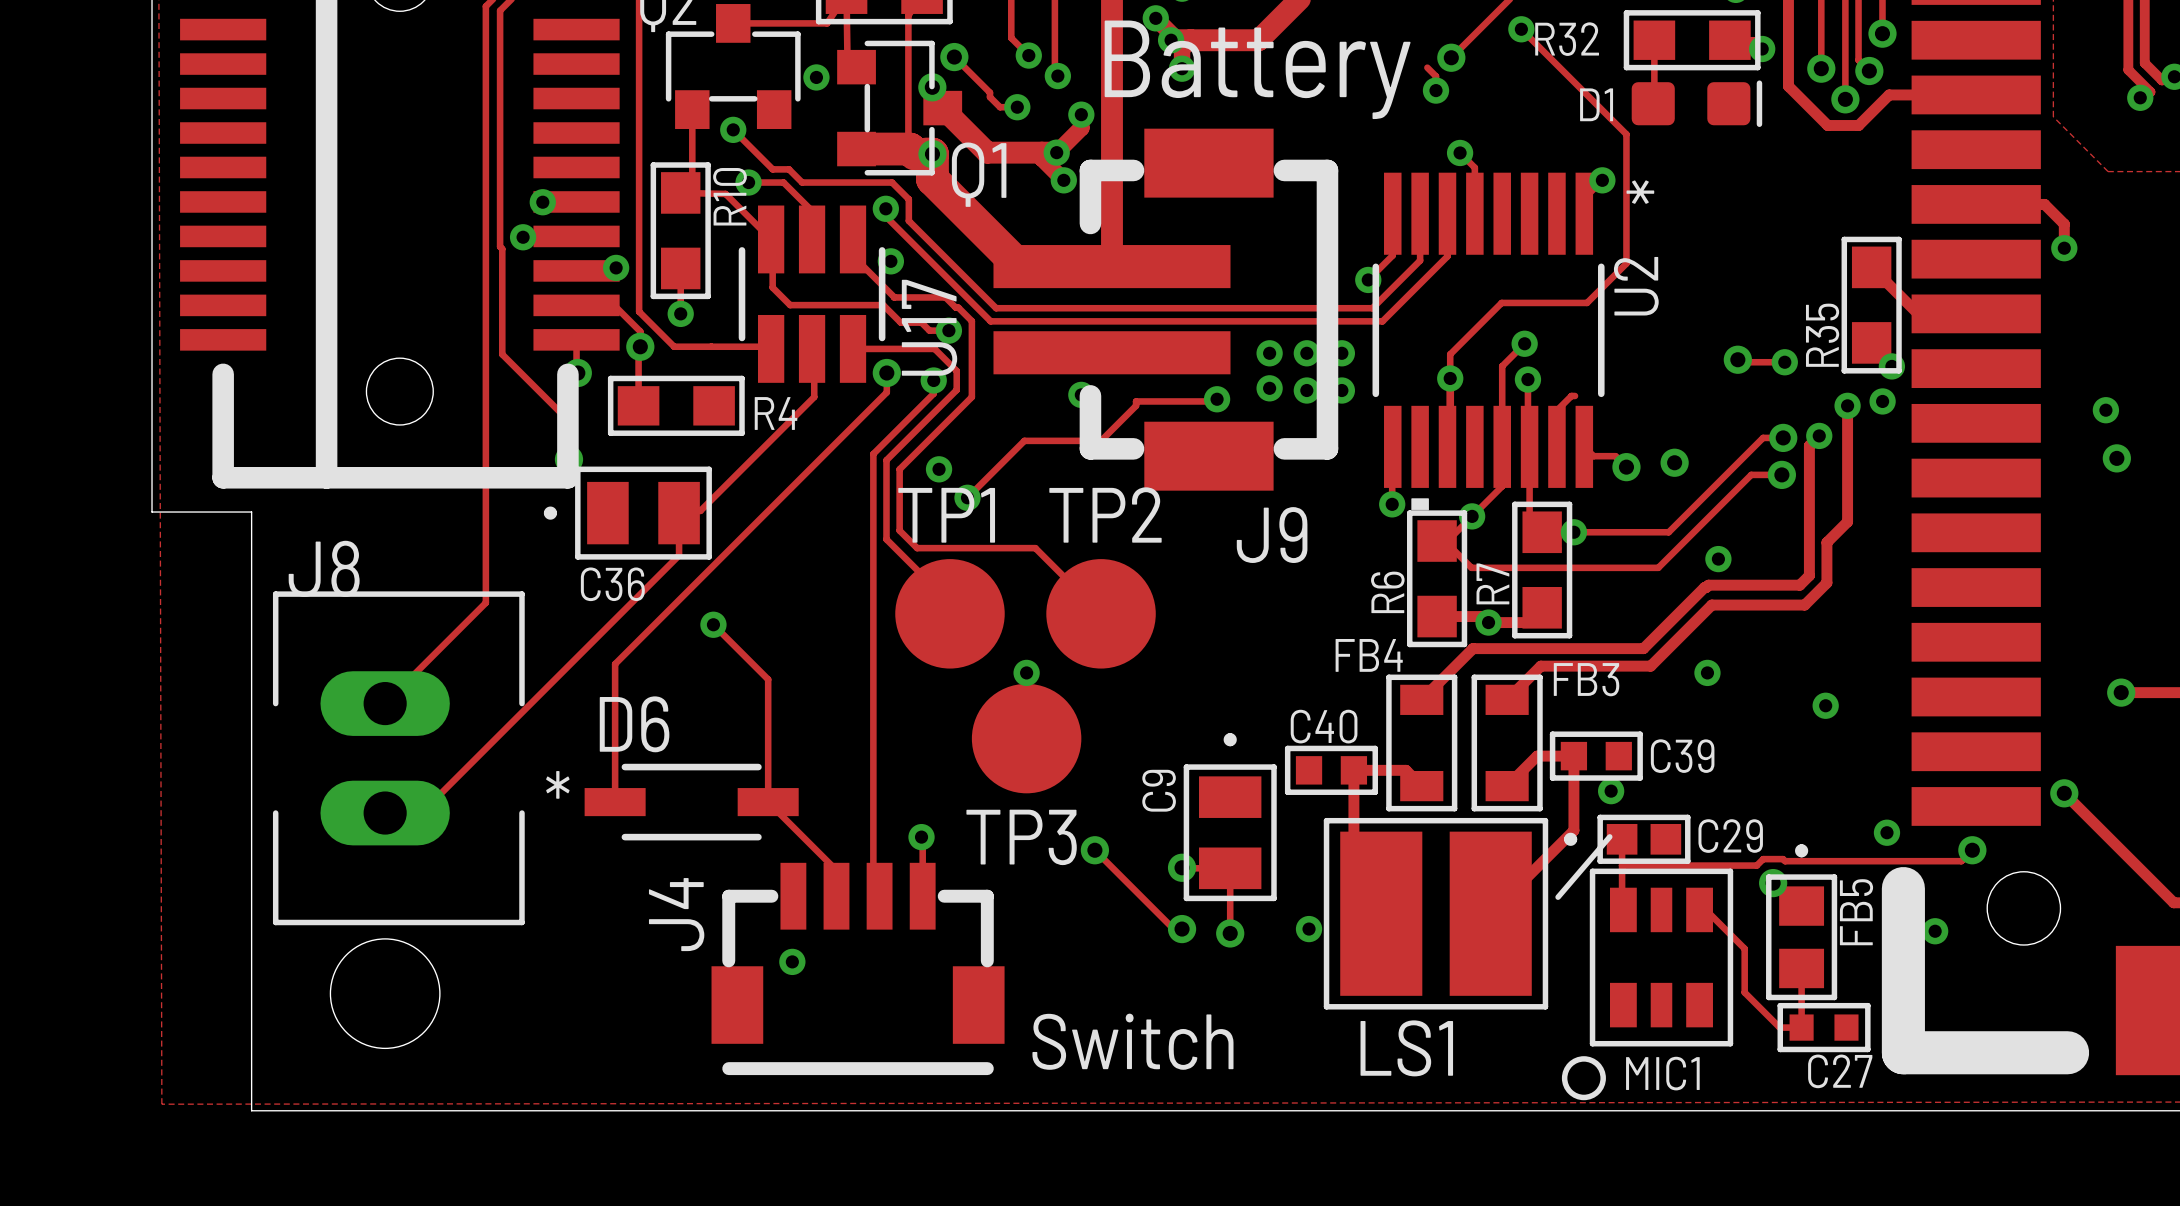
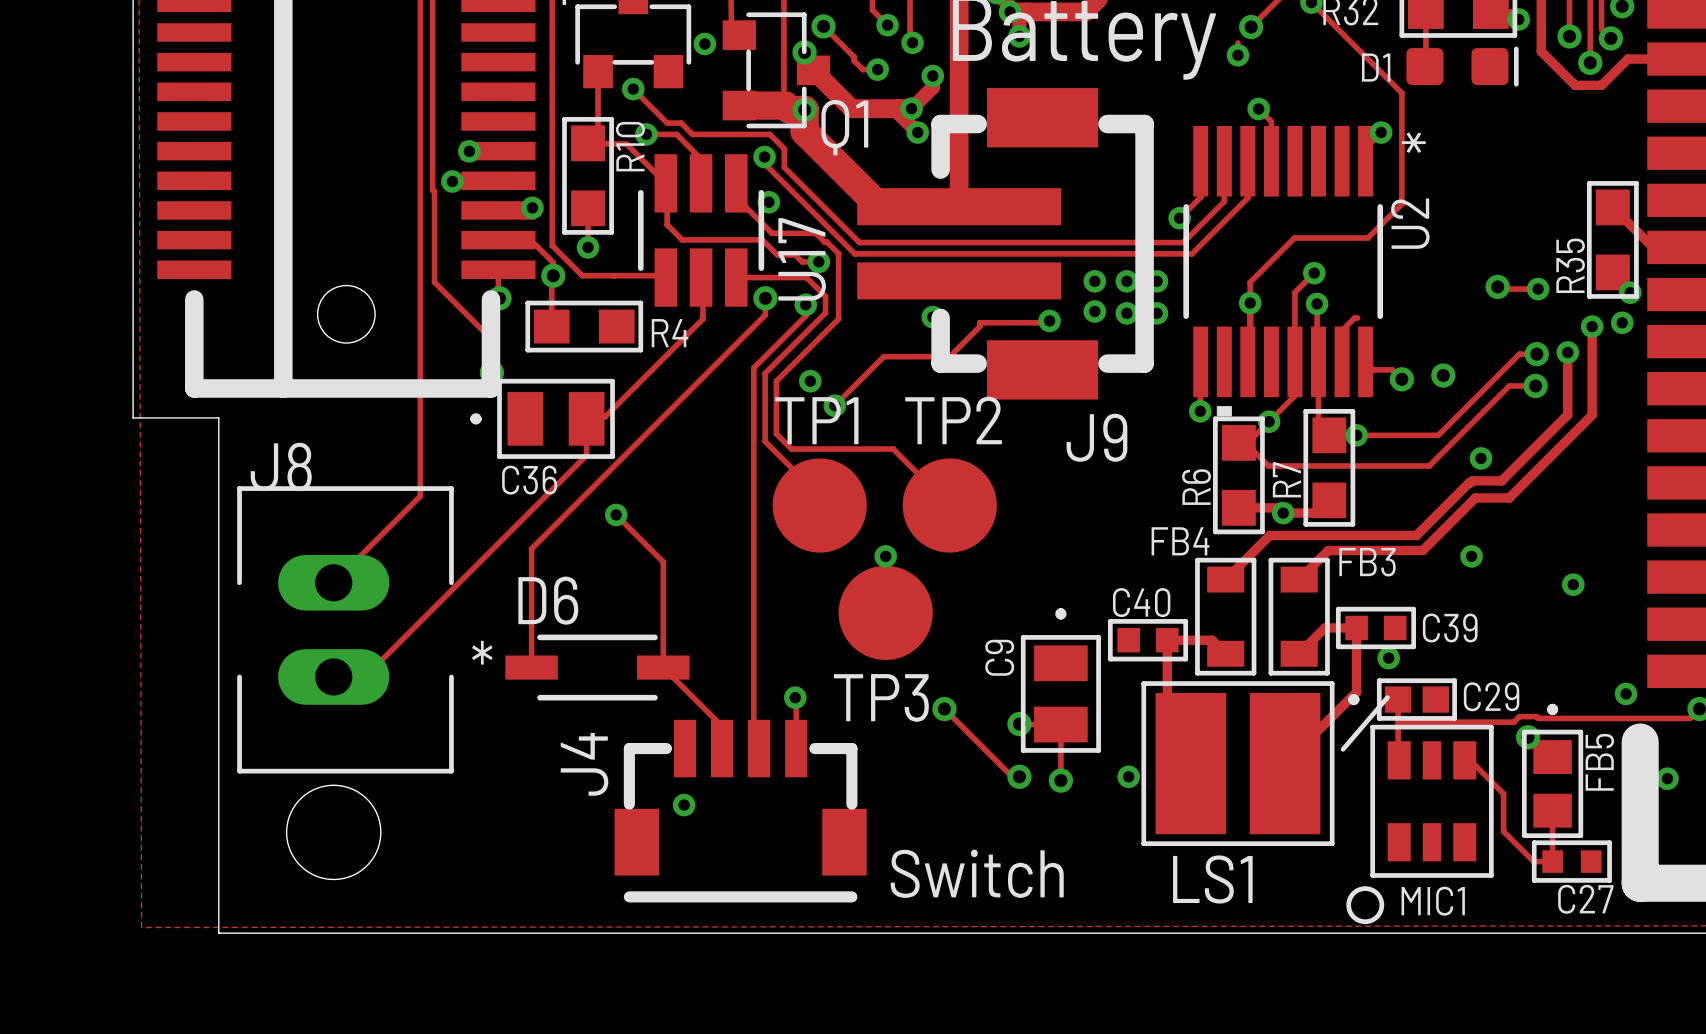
track: (1427, 67) (1436, 76) -> none
track: (1819, 435) (1809, 445) (1809, 575) (1799, 585) (1742, 585) -> (1567, 352) (1567, 414) (1501, 480)
track: (1847, 508) (1847, 521) (1826, 542) (1826, 582) (1804, 605) (1751, 605) -> (1592, 415) (1509, 497)

